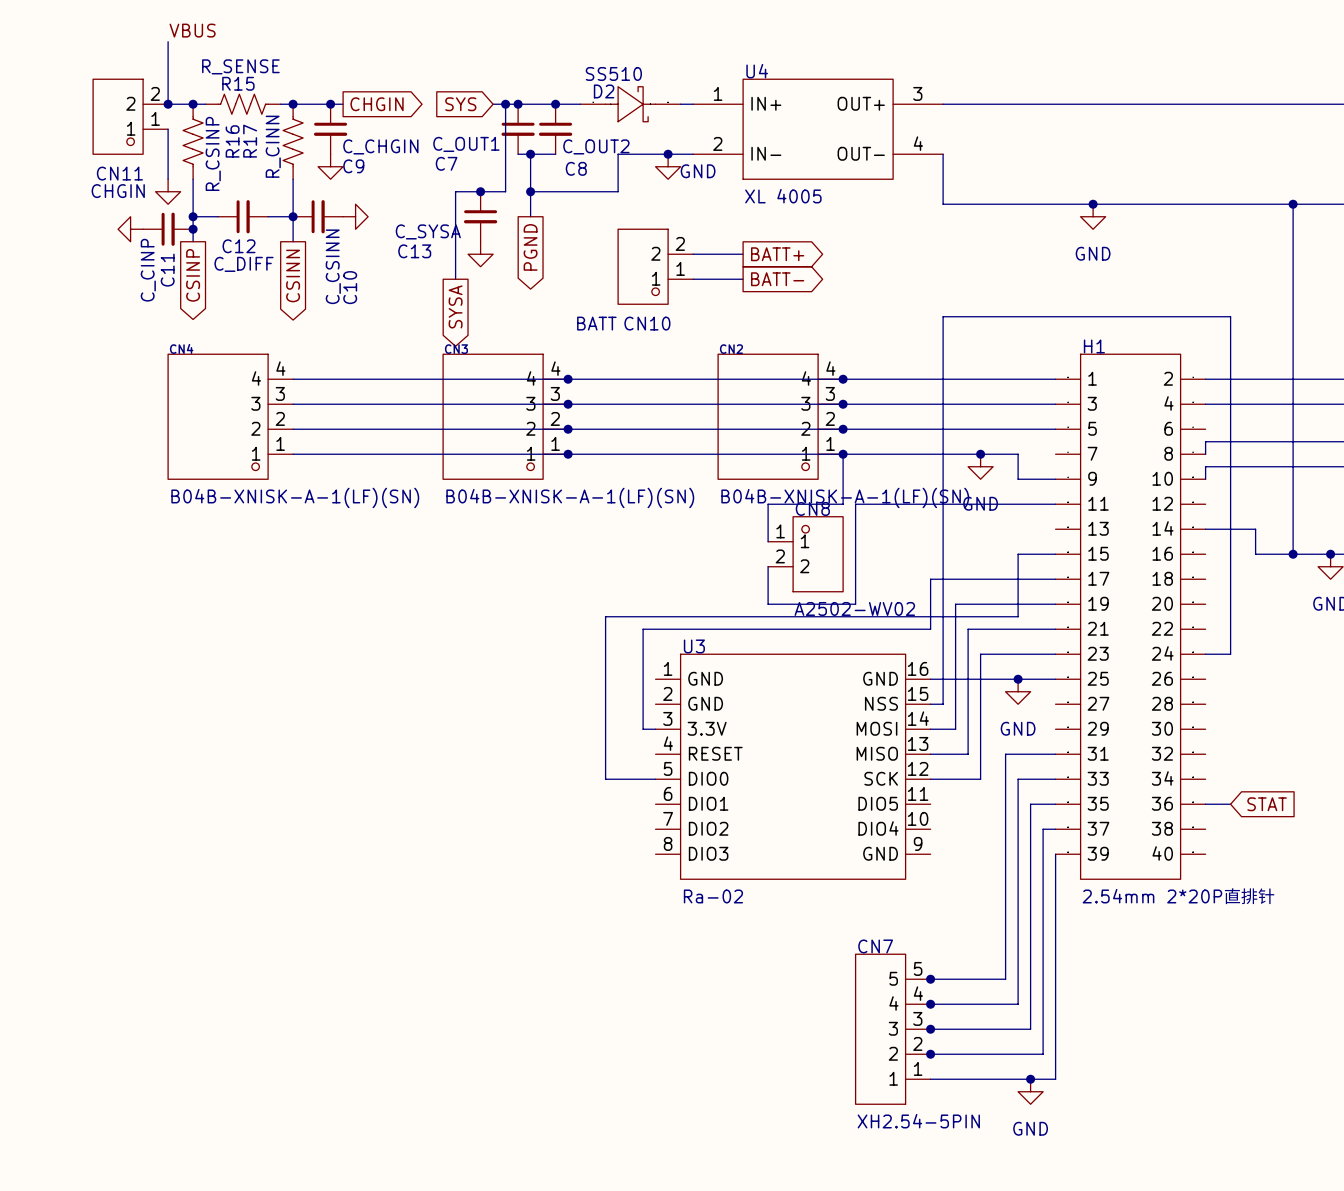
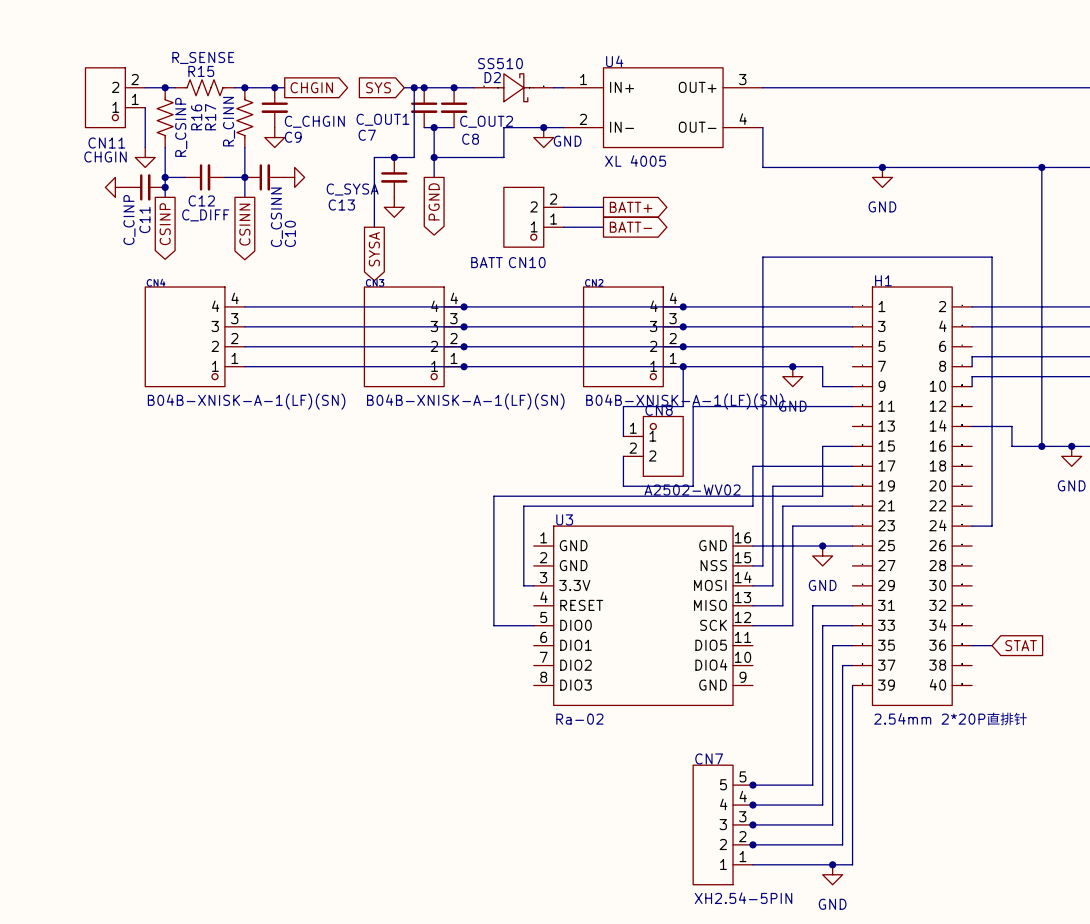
label: VBUS (192, 30) -> none
wire: (168, 41) (168, 104) -> none
junction: (168, 104) -> none

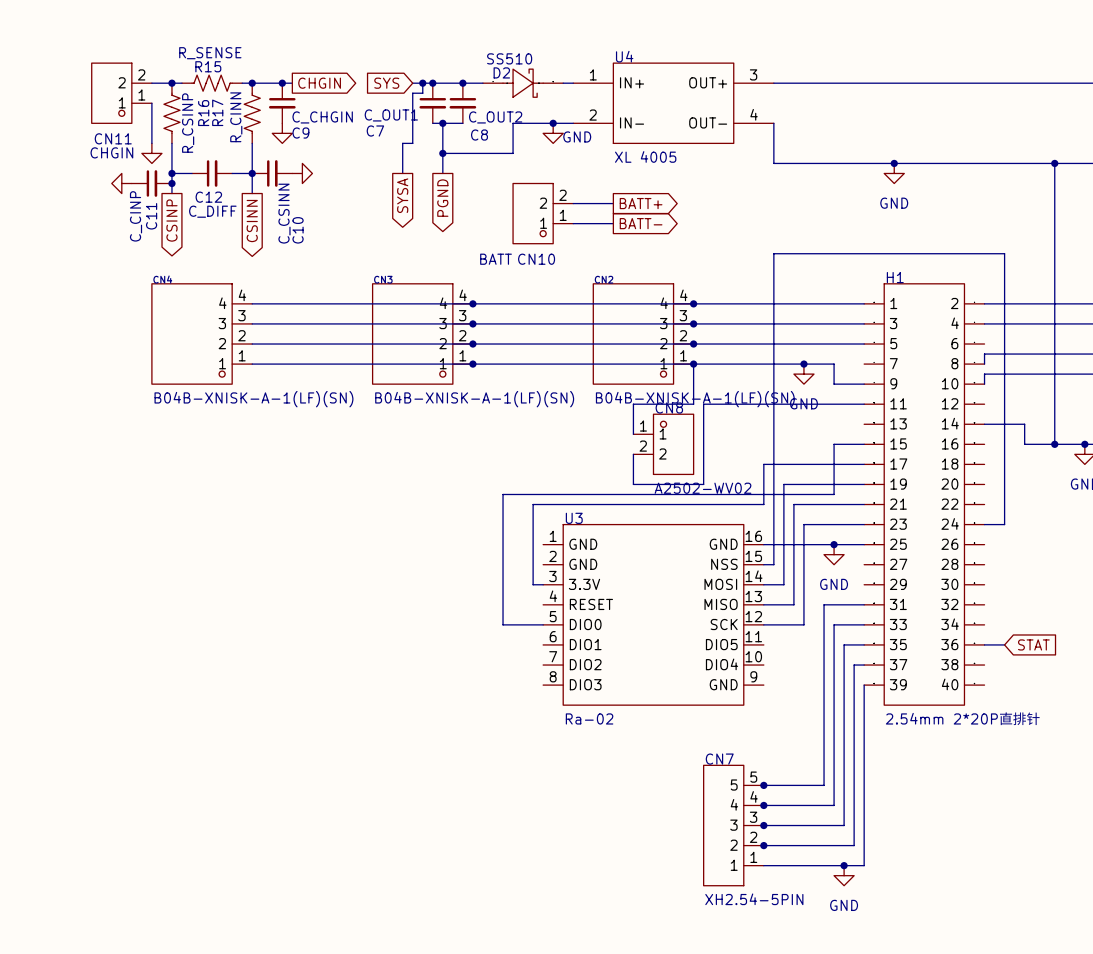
wire: (414, 97) (414, 157) (374, 157) (374, 227) -> (422, 93) (412, 93) (412, 143) (402, 143) (402, 173)
junction: (394, 157) -> none
C13: C_SYSA (394, 177) -> none
power symbol: (394, 207) -> none
global label position: SYSA (374, 249) -> SYSA (402, 195)

